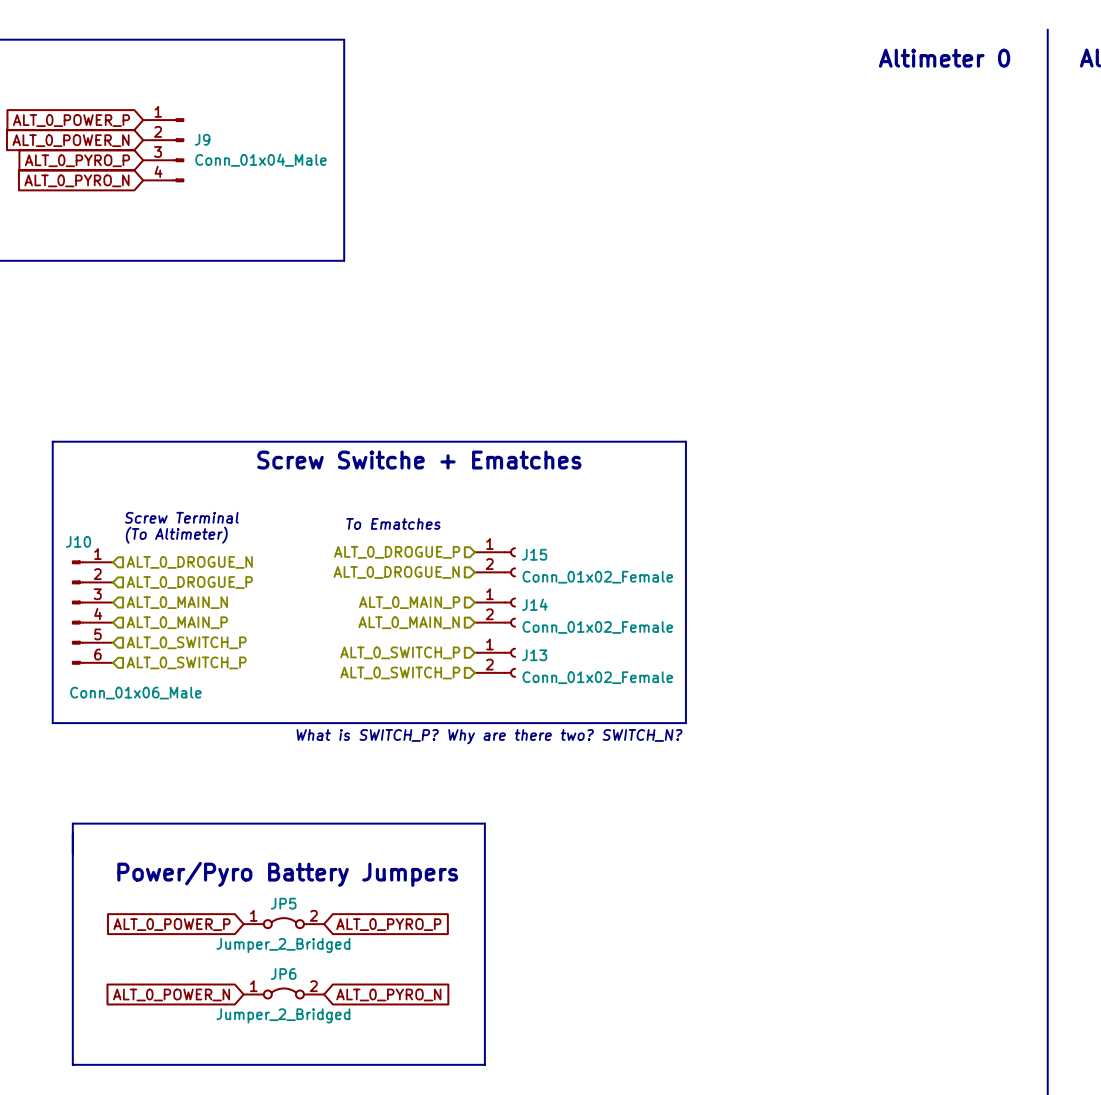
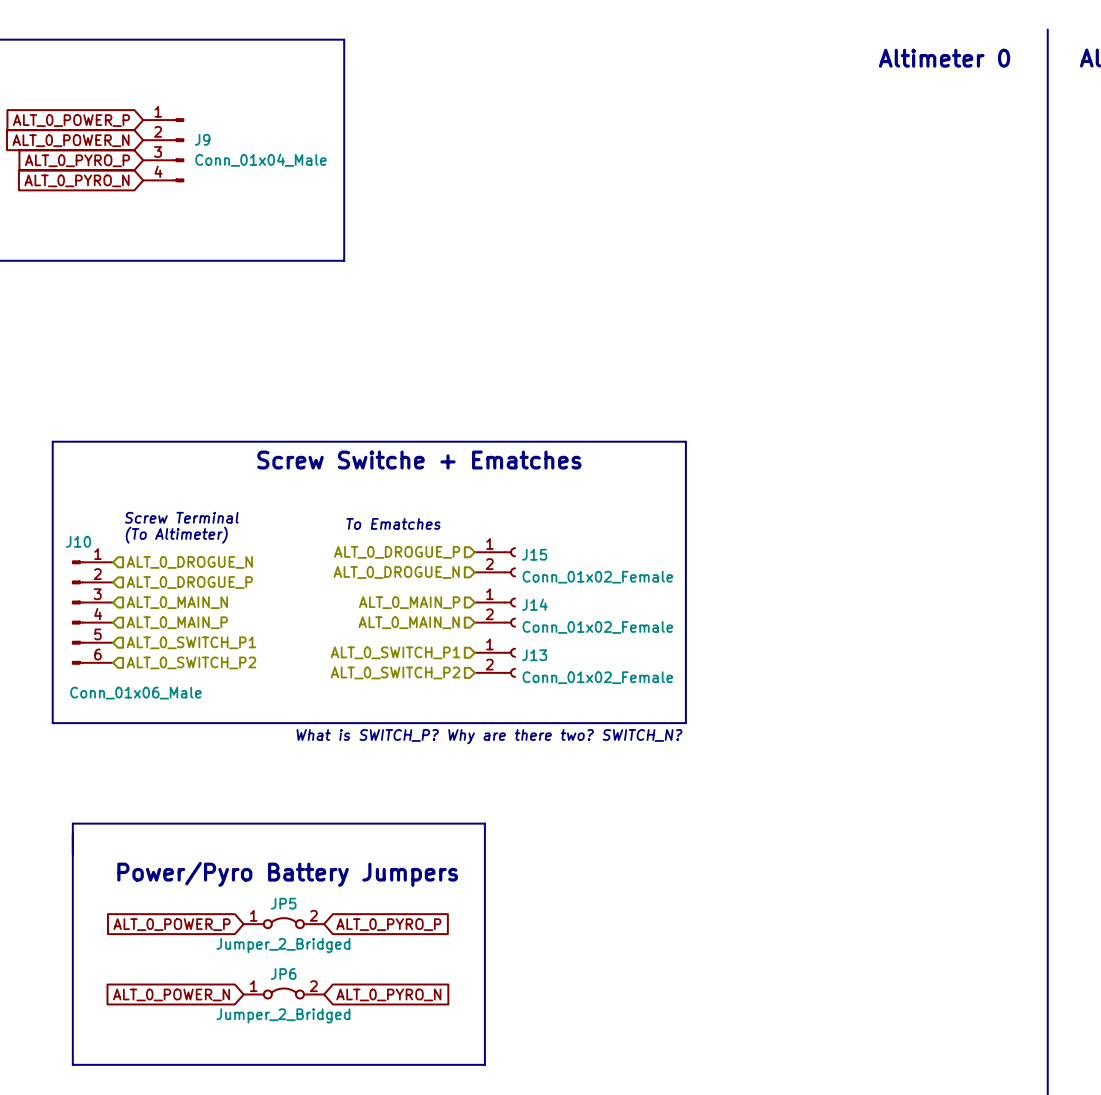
hierarchical label: ALT_0_SWITCH_P (186, 642) -> ALT_0_SWITCH_P1 (191, 642)
hierarchical label: ALT_0_SWITCH_P (400, 652) -> ALT_0_SWITCH_P1 (395, 652)
hierarchical label: ALT_0_SWITCH_P (186, 662) -> ALT_0_SWITCH_P2 (191, 662)
hierarchical label: ALT_0_SWITCH_P (400, 672) -> ALT_0_SWITCH_P2 (395, 672)

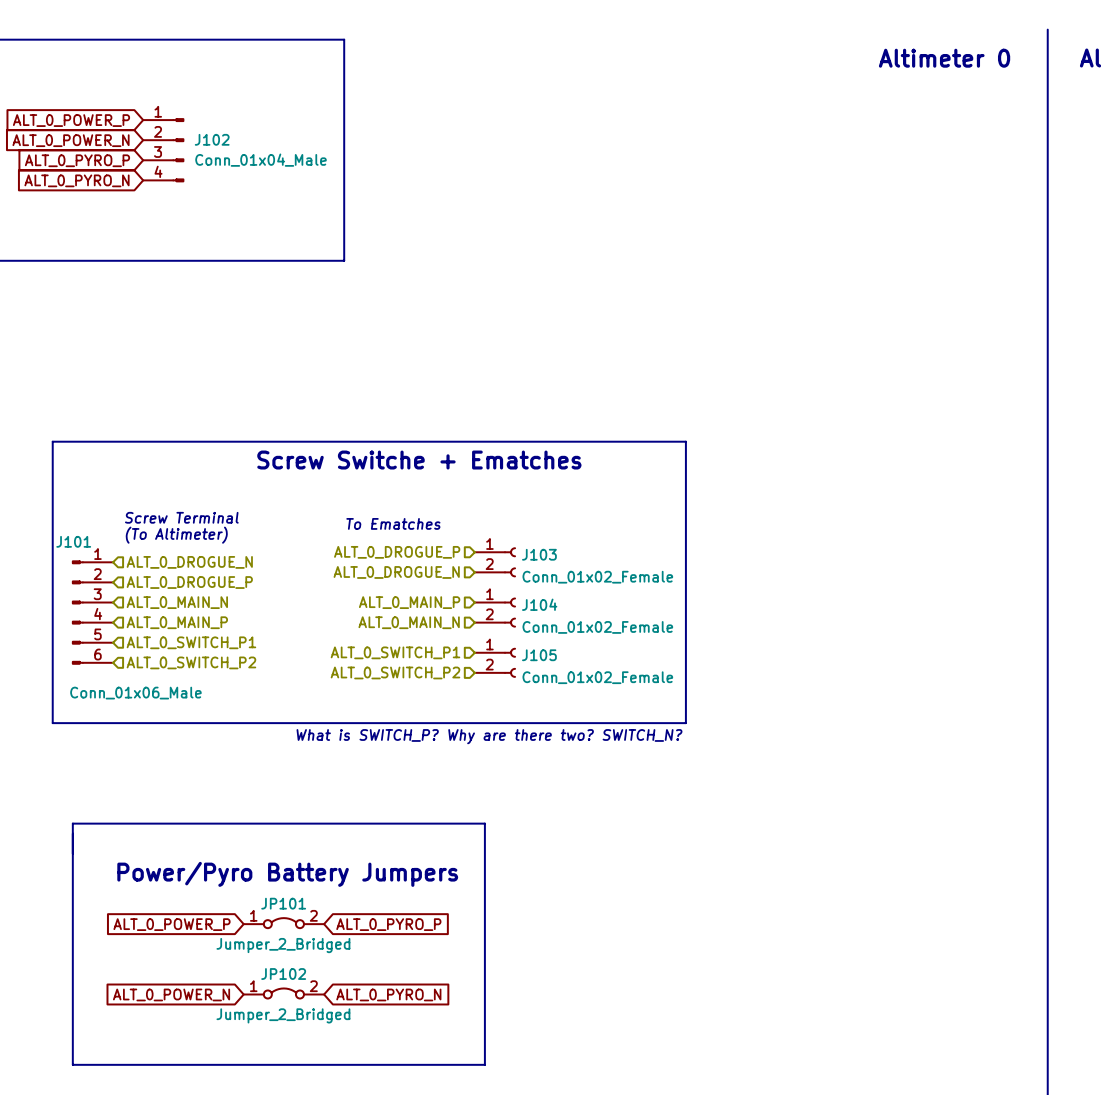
J9 name: J9 (202, 139) -> J102 (212, 139)
J10 name: J10 (78, 541) -> J101 (73, 541)
J15 name: J15 (534, 554) -> J103 (539, 554)
J14 name: J14 (534, 604) -> J104 (539, 604)
J13 name: J13 (534, 655) -> J105 (539, 655)
JP5 name: JP5 (283, 903) -> JP101 (283, 903)
JP6 name: JP6 (283, 974) -> JP102 (283, 974)

